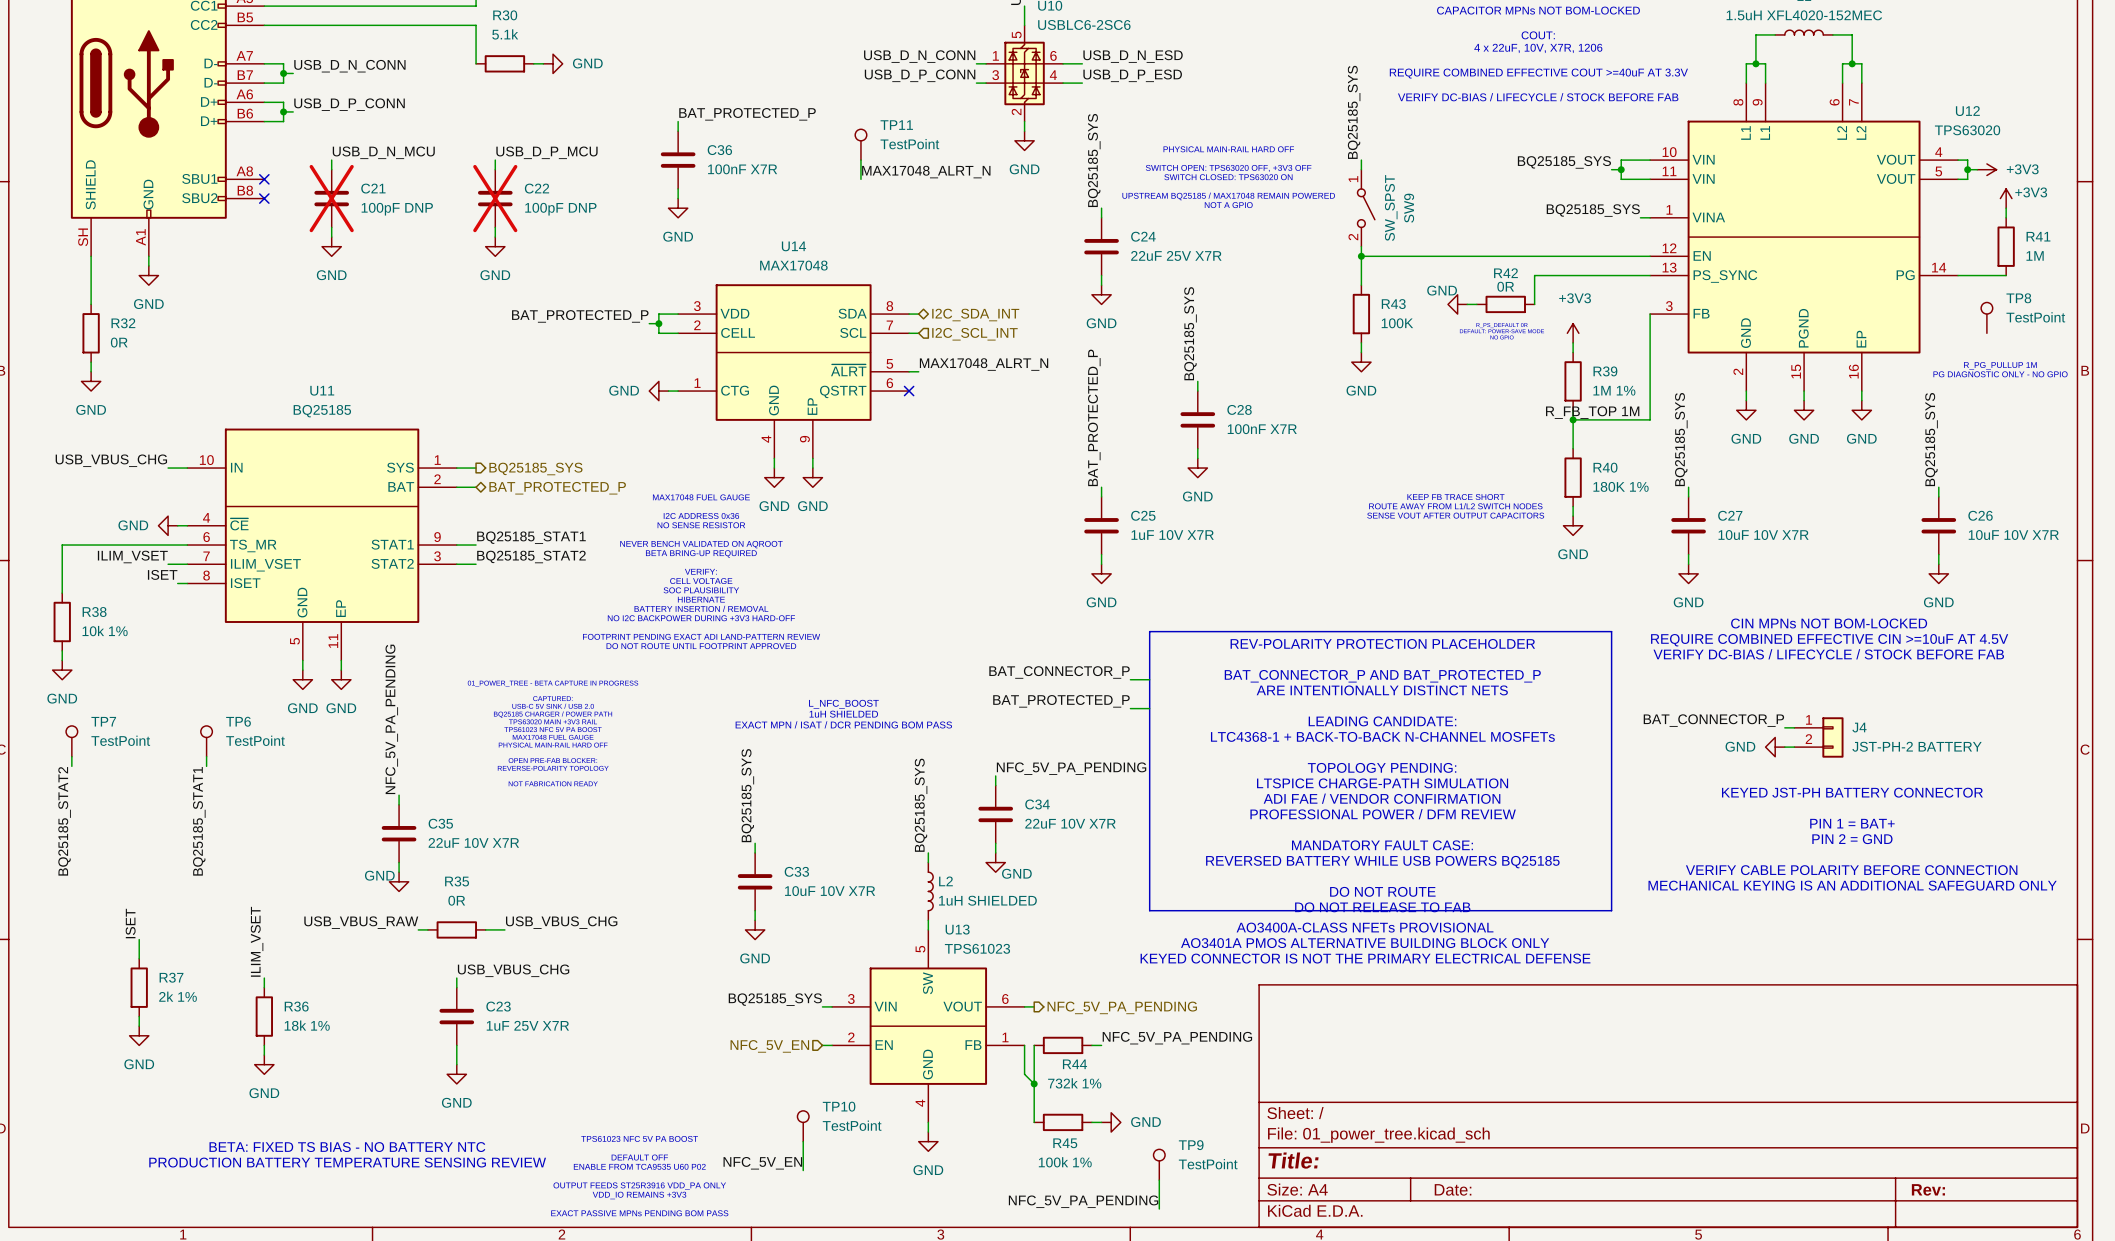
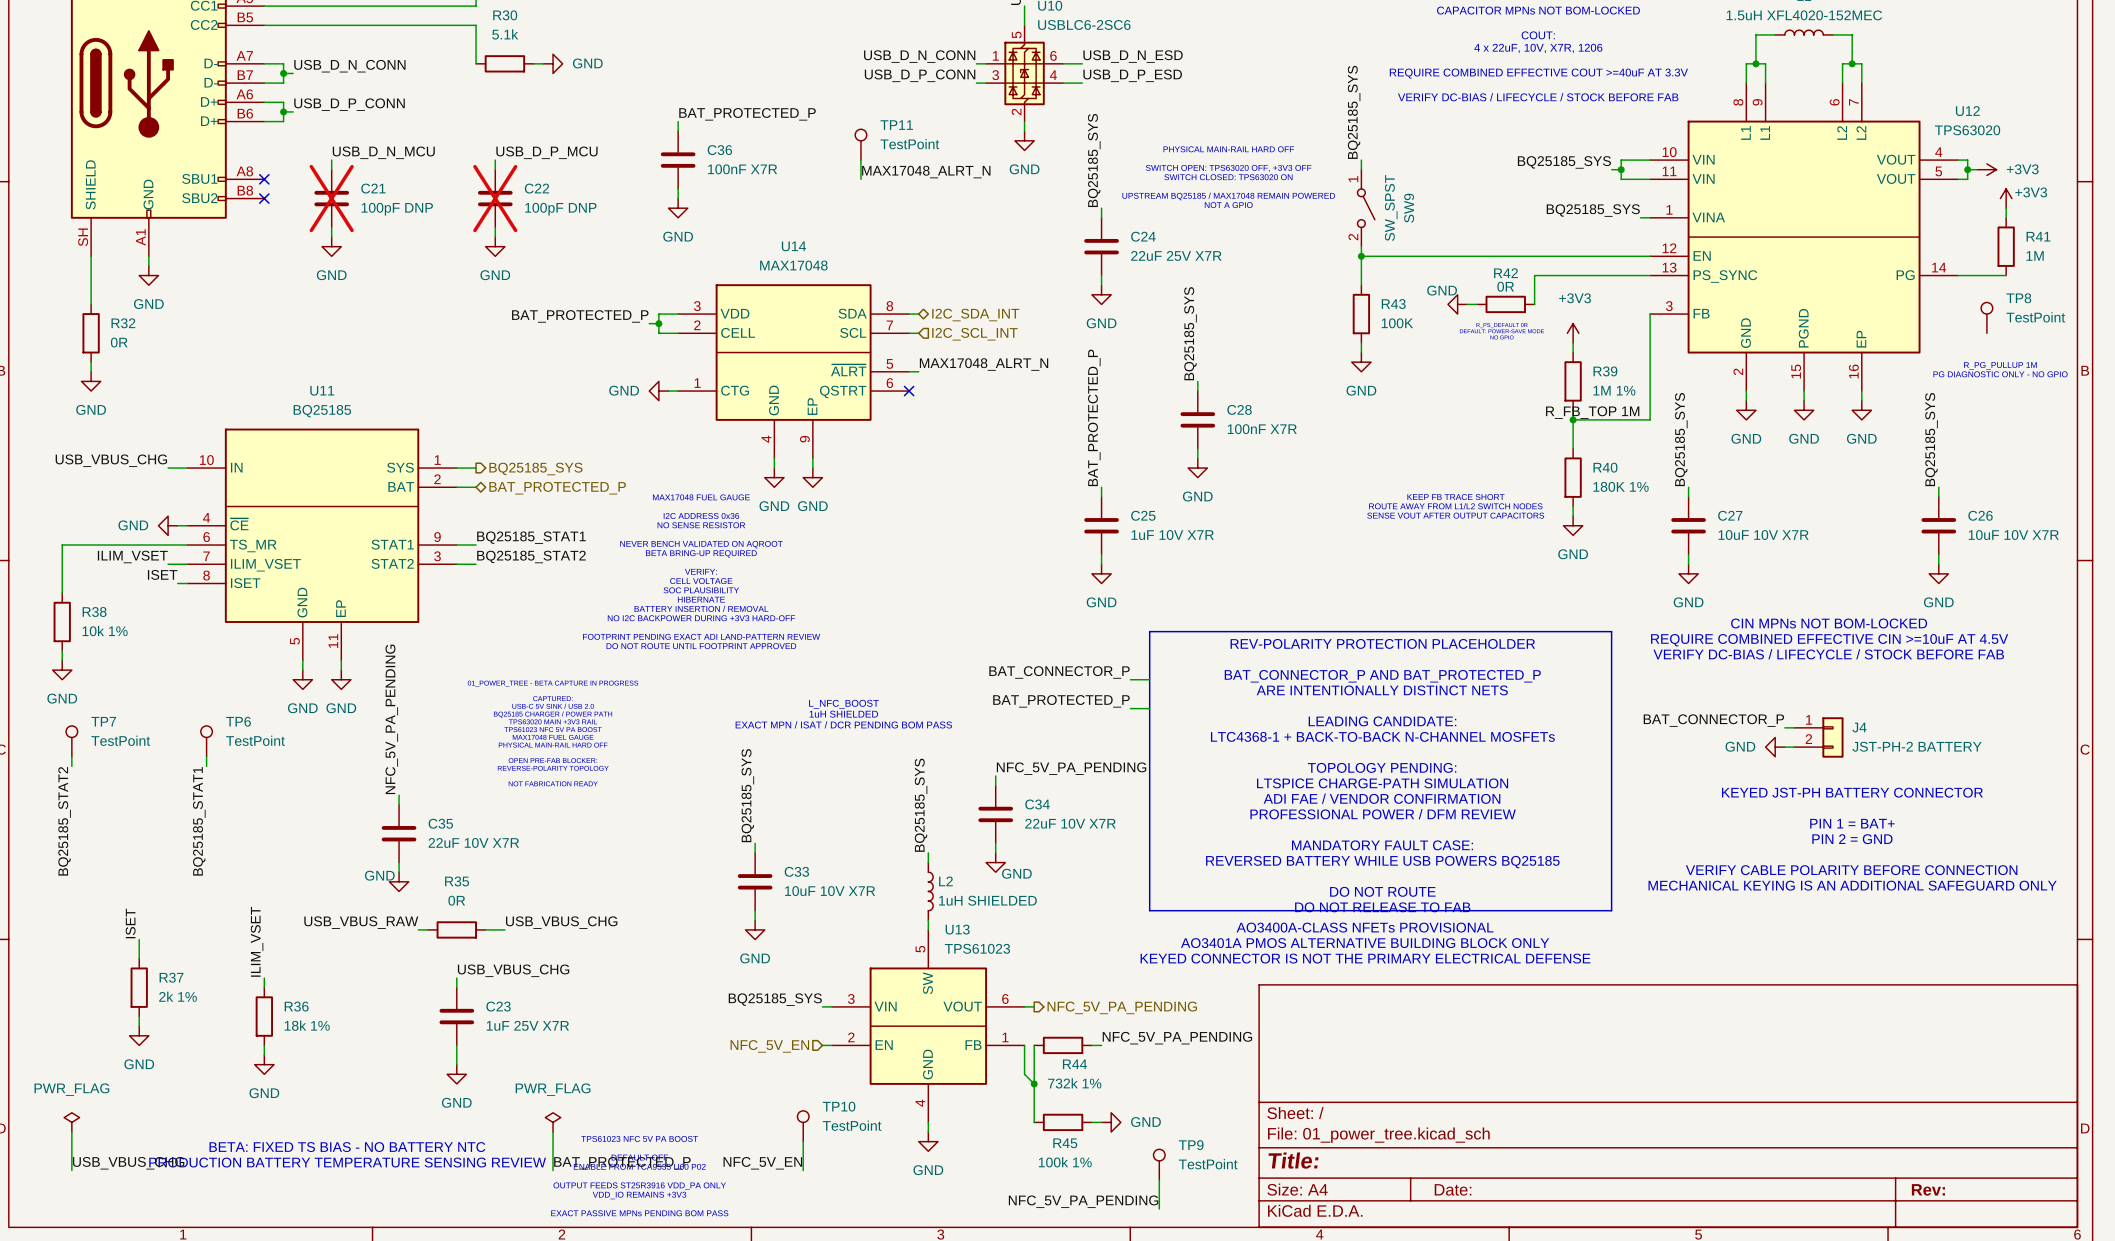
power symbol: none -> PWR_FLAG (71, 1122)
power symbol: none -> PWR_FLAG (553, 1122)
wire: none -> (71, 1132) (71, 1170)
wire: none -> (553, 1132) (553, 1170)
label: none -> USB_VBUS_CHG (128, 1163)
label: none -> BAT_PROTECTED_P (622, 1163)

